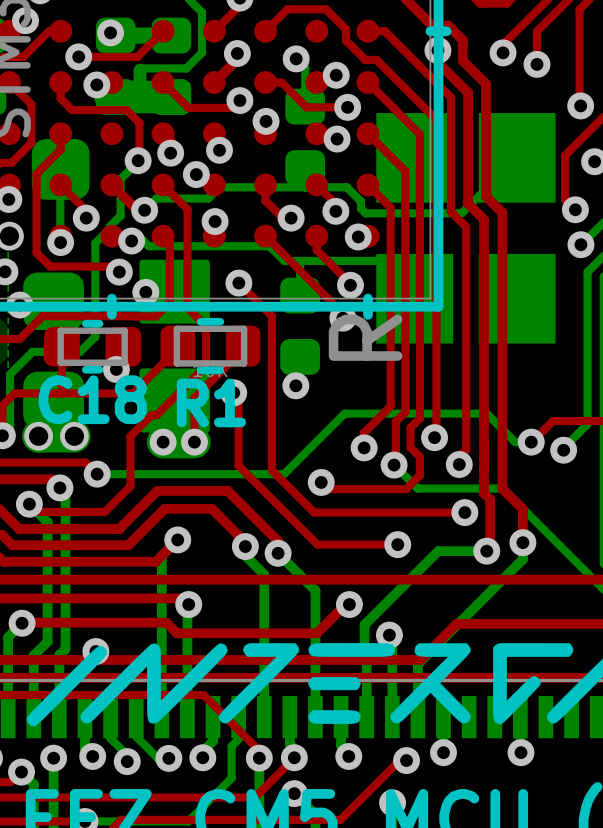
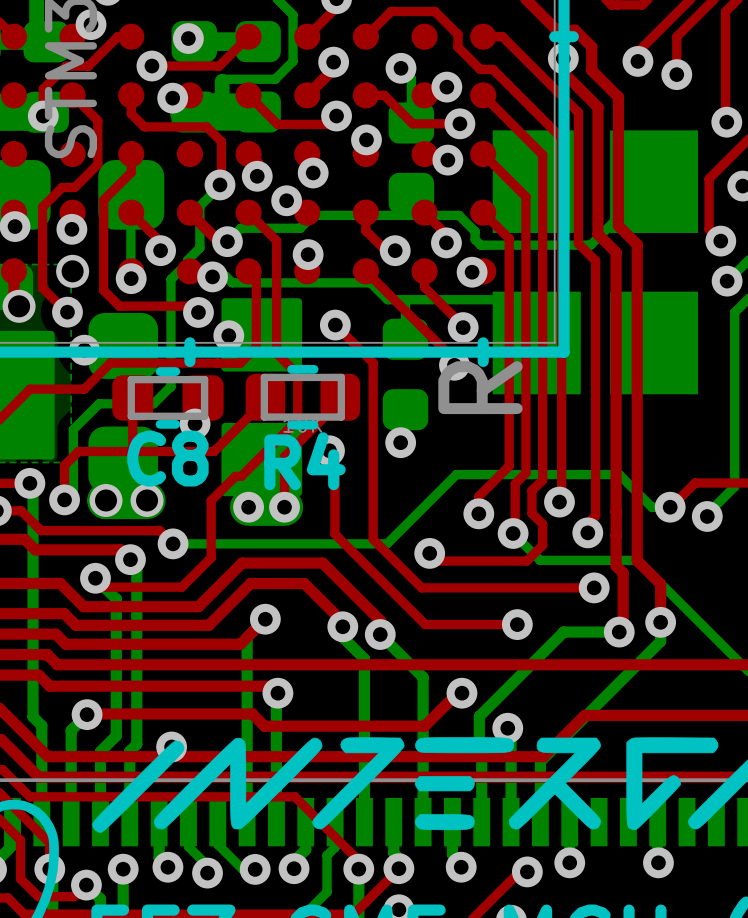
C18 name: C18 (92, 399) -> C8 (167, 458)
R1 name: R1 (211, 402) -> R4 (304, 461)

